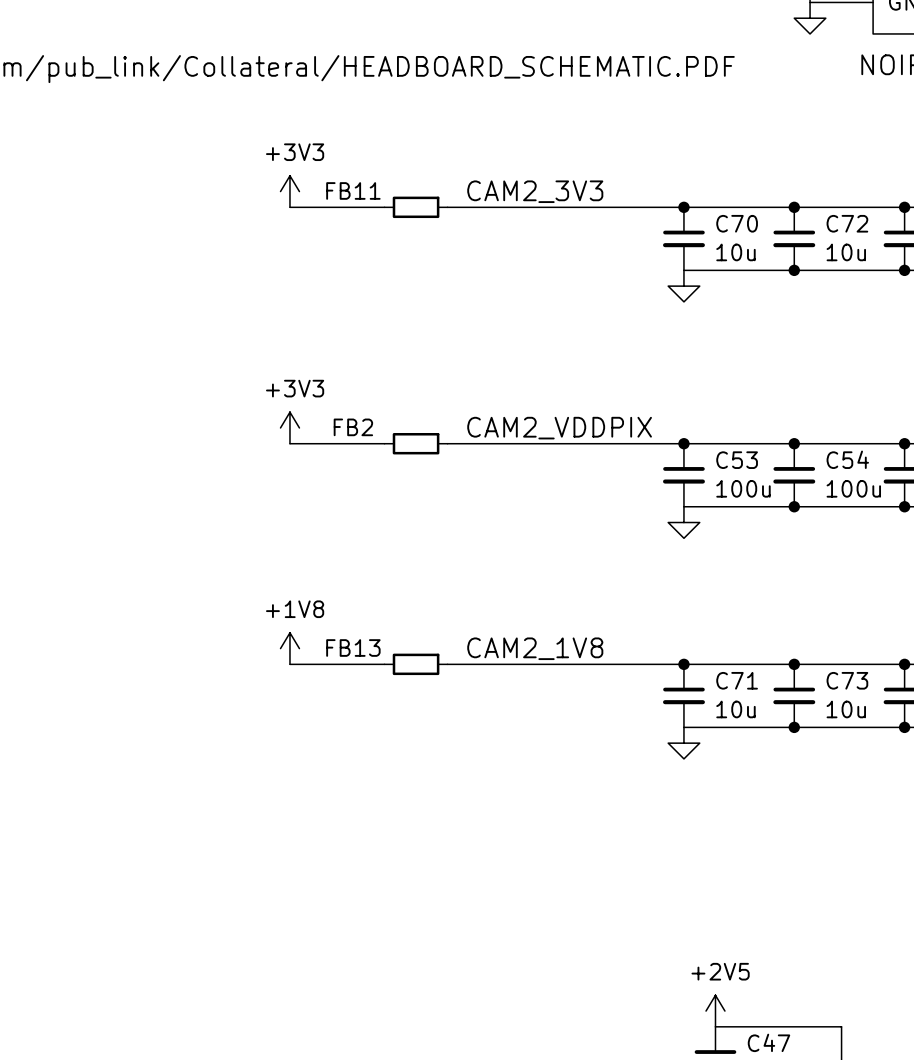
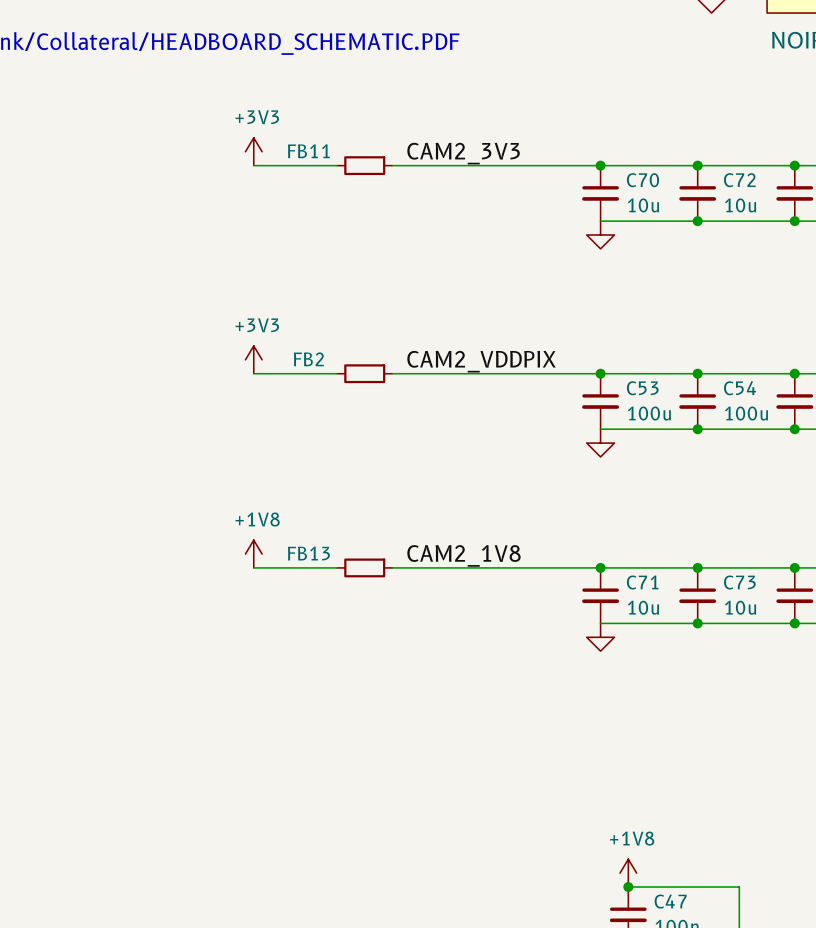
power symbol: +2V5 (715, 1011) -> +1V8 (628, 873)
junction: none -> (628, 887)

